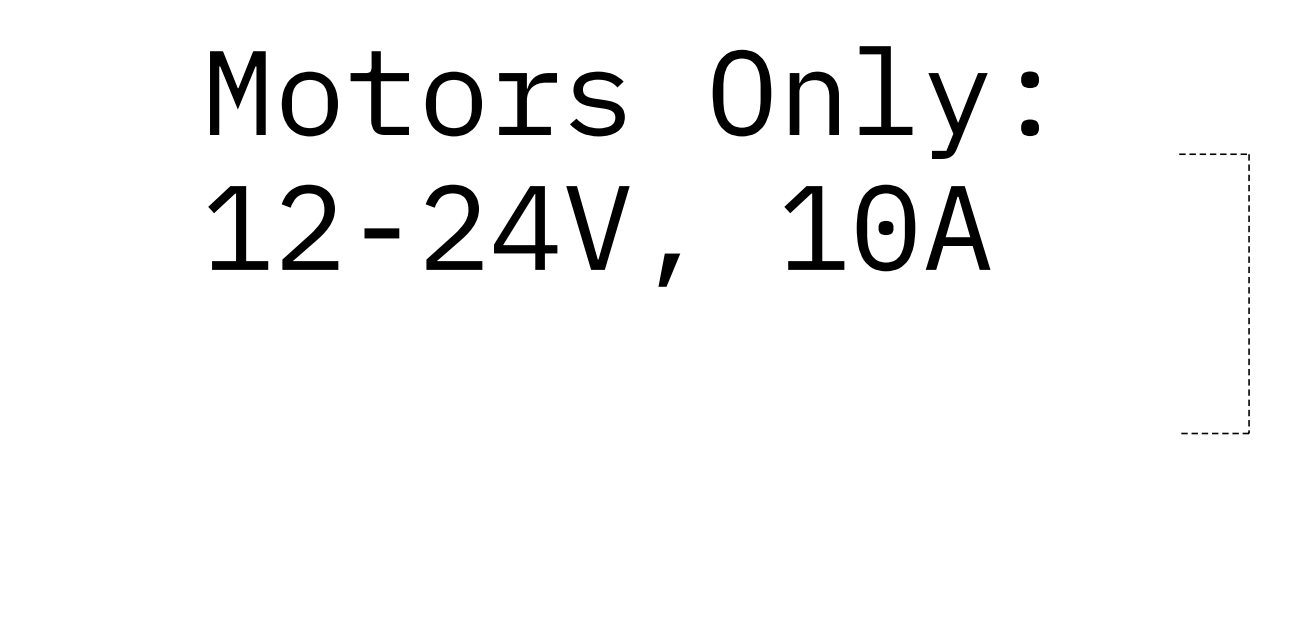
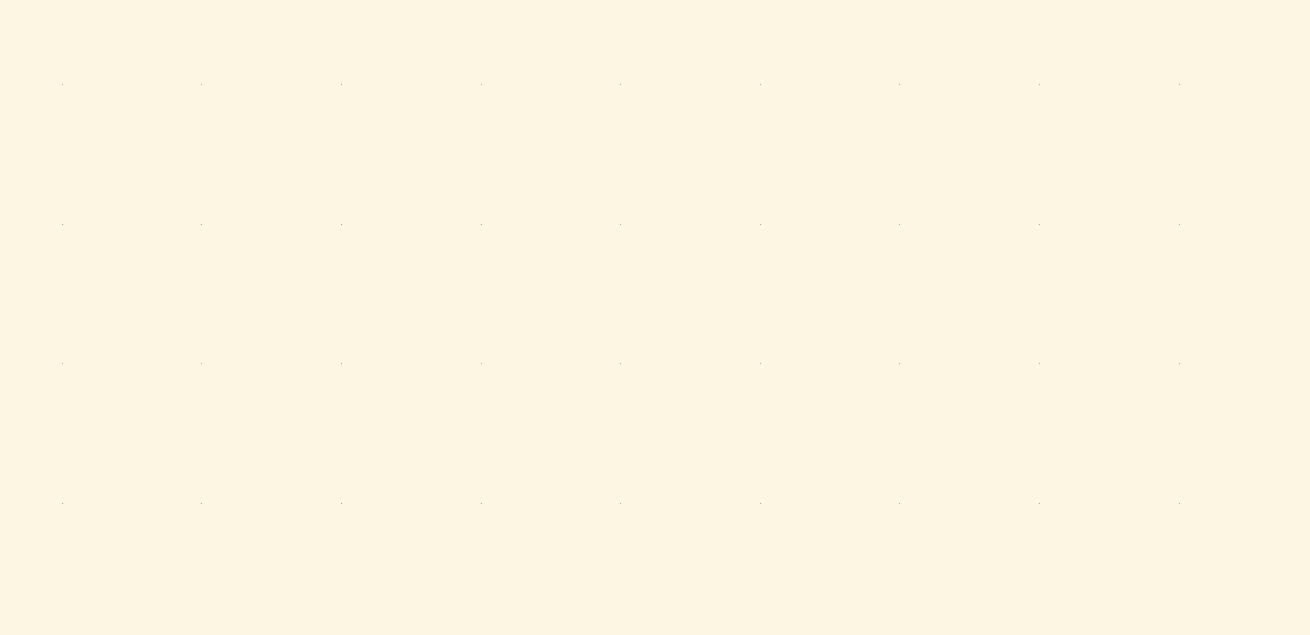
text: Motors Only: (624, 102) -> none
line: (1179, 154) (1249, 154) (1249, 433) (1179, 433) -> none
text: 12-24V, 10A (599, 235) -> none

